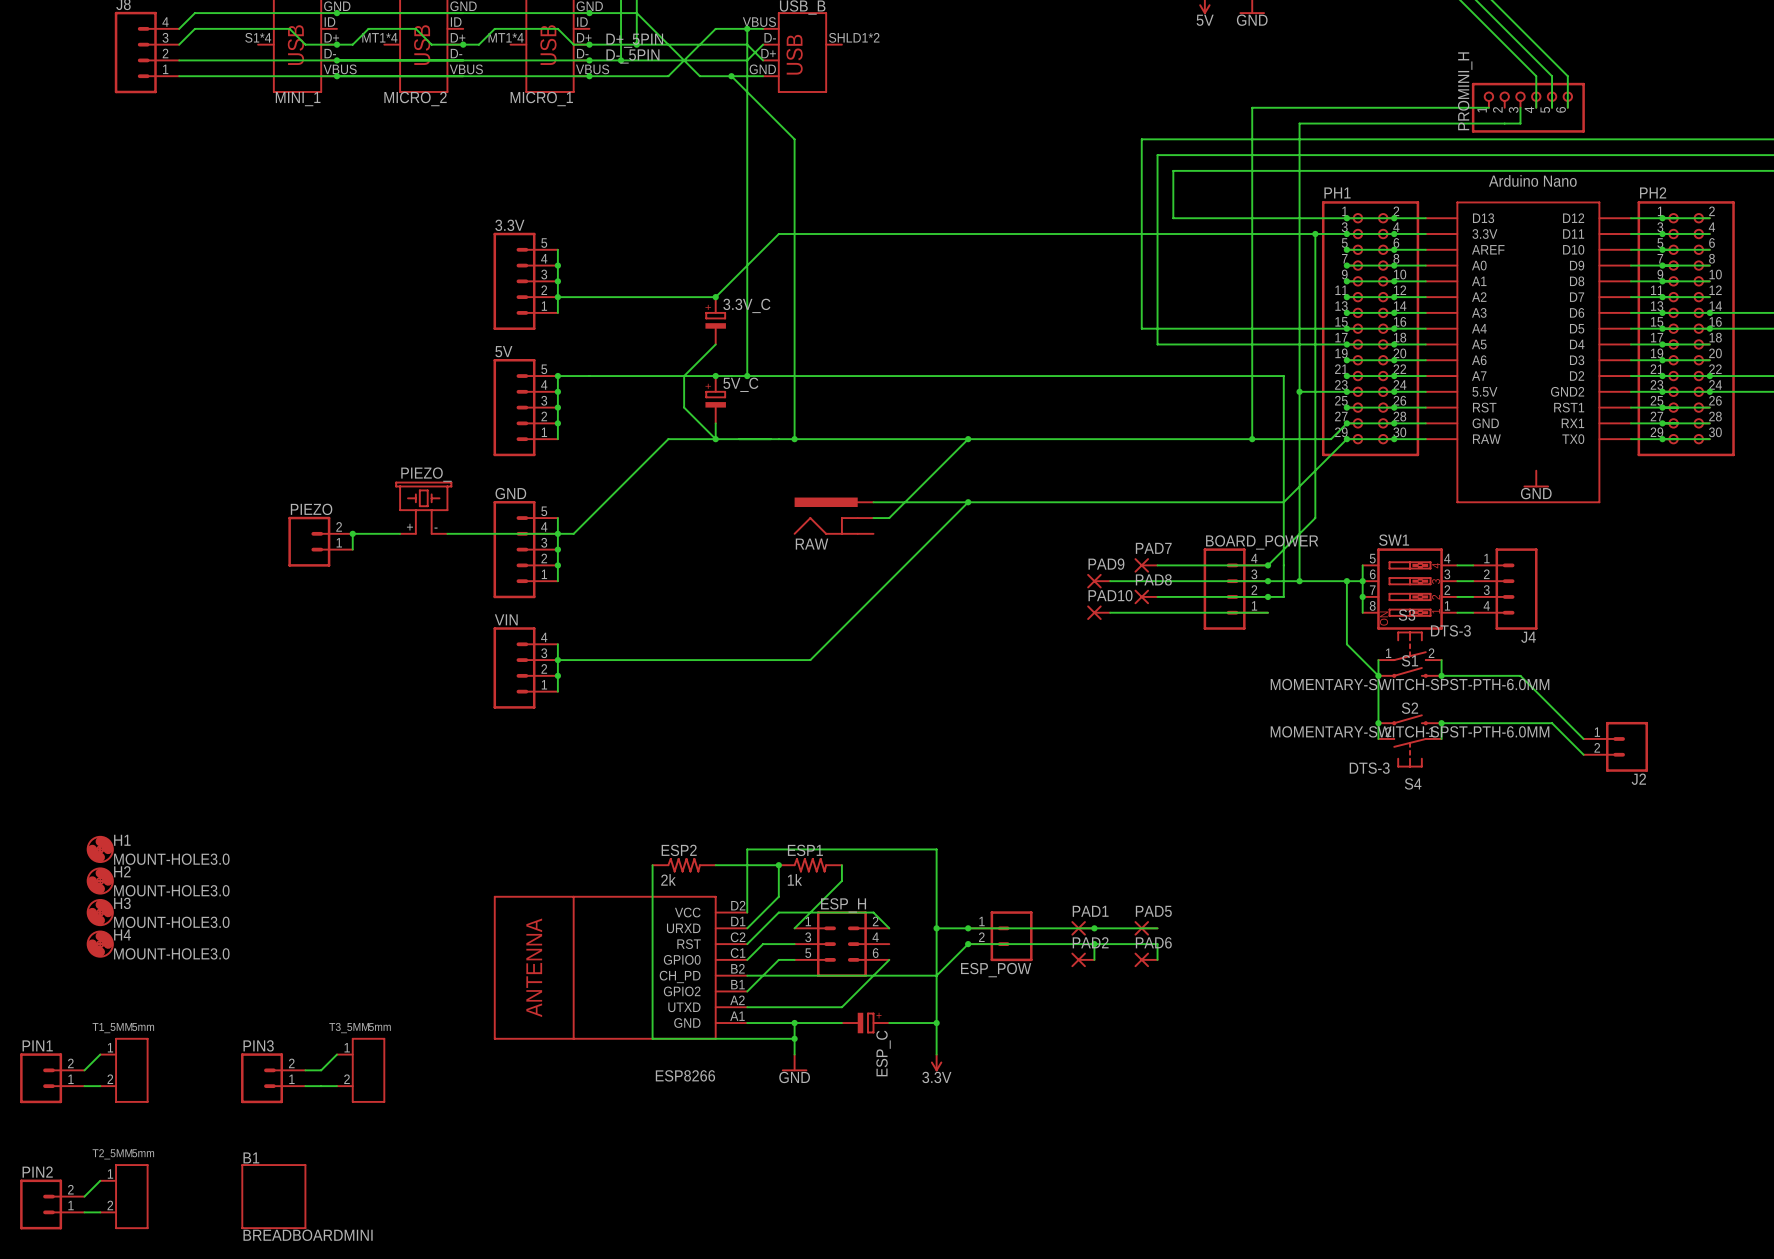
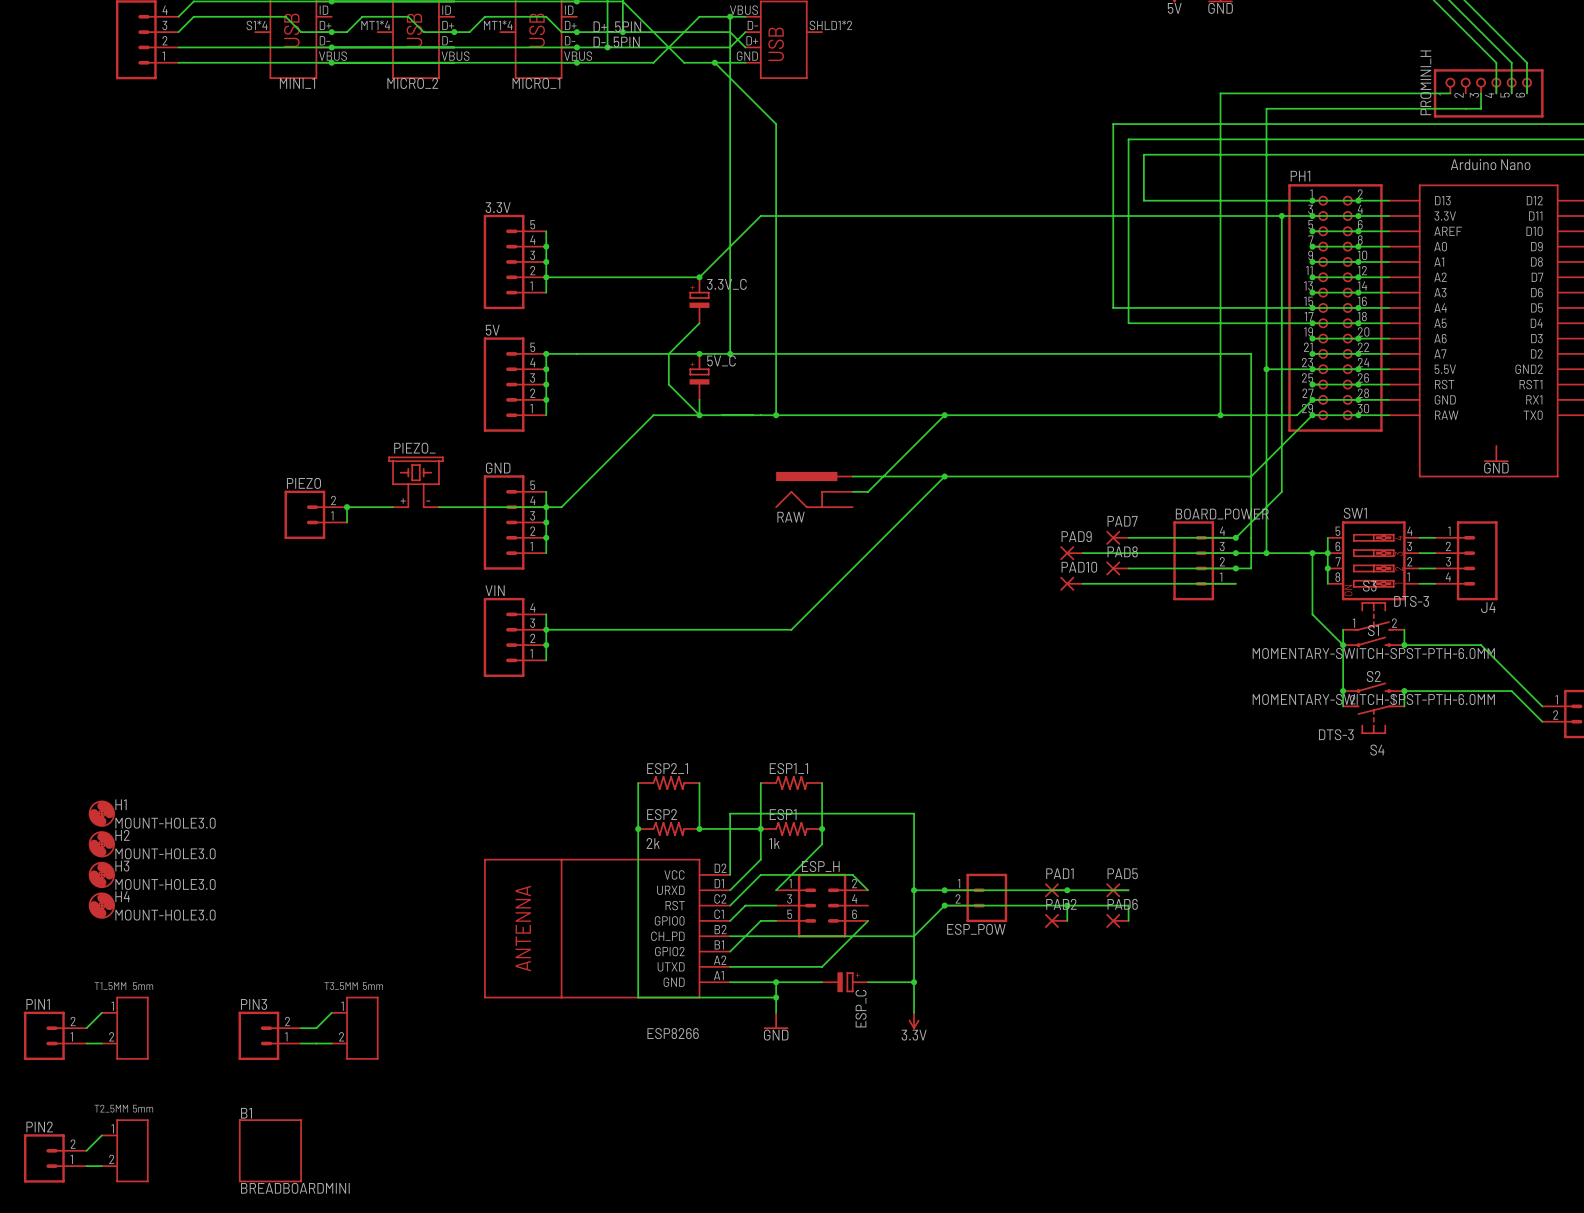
wire: none -> (638, 783) (638, 828)
ESP2_1: none -> (668, 783)
wire: none -> (699, 783) (699, 828)
wire: none -> (760, 783) (760, 828)
ESP1_1: none -> (791, 783)
wire: none -> (822, 783) (822, 828)
junction: none -> (638, 828)
junction: none -> (699, 828)
junction: none -> (822, 828)

